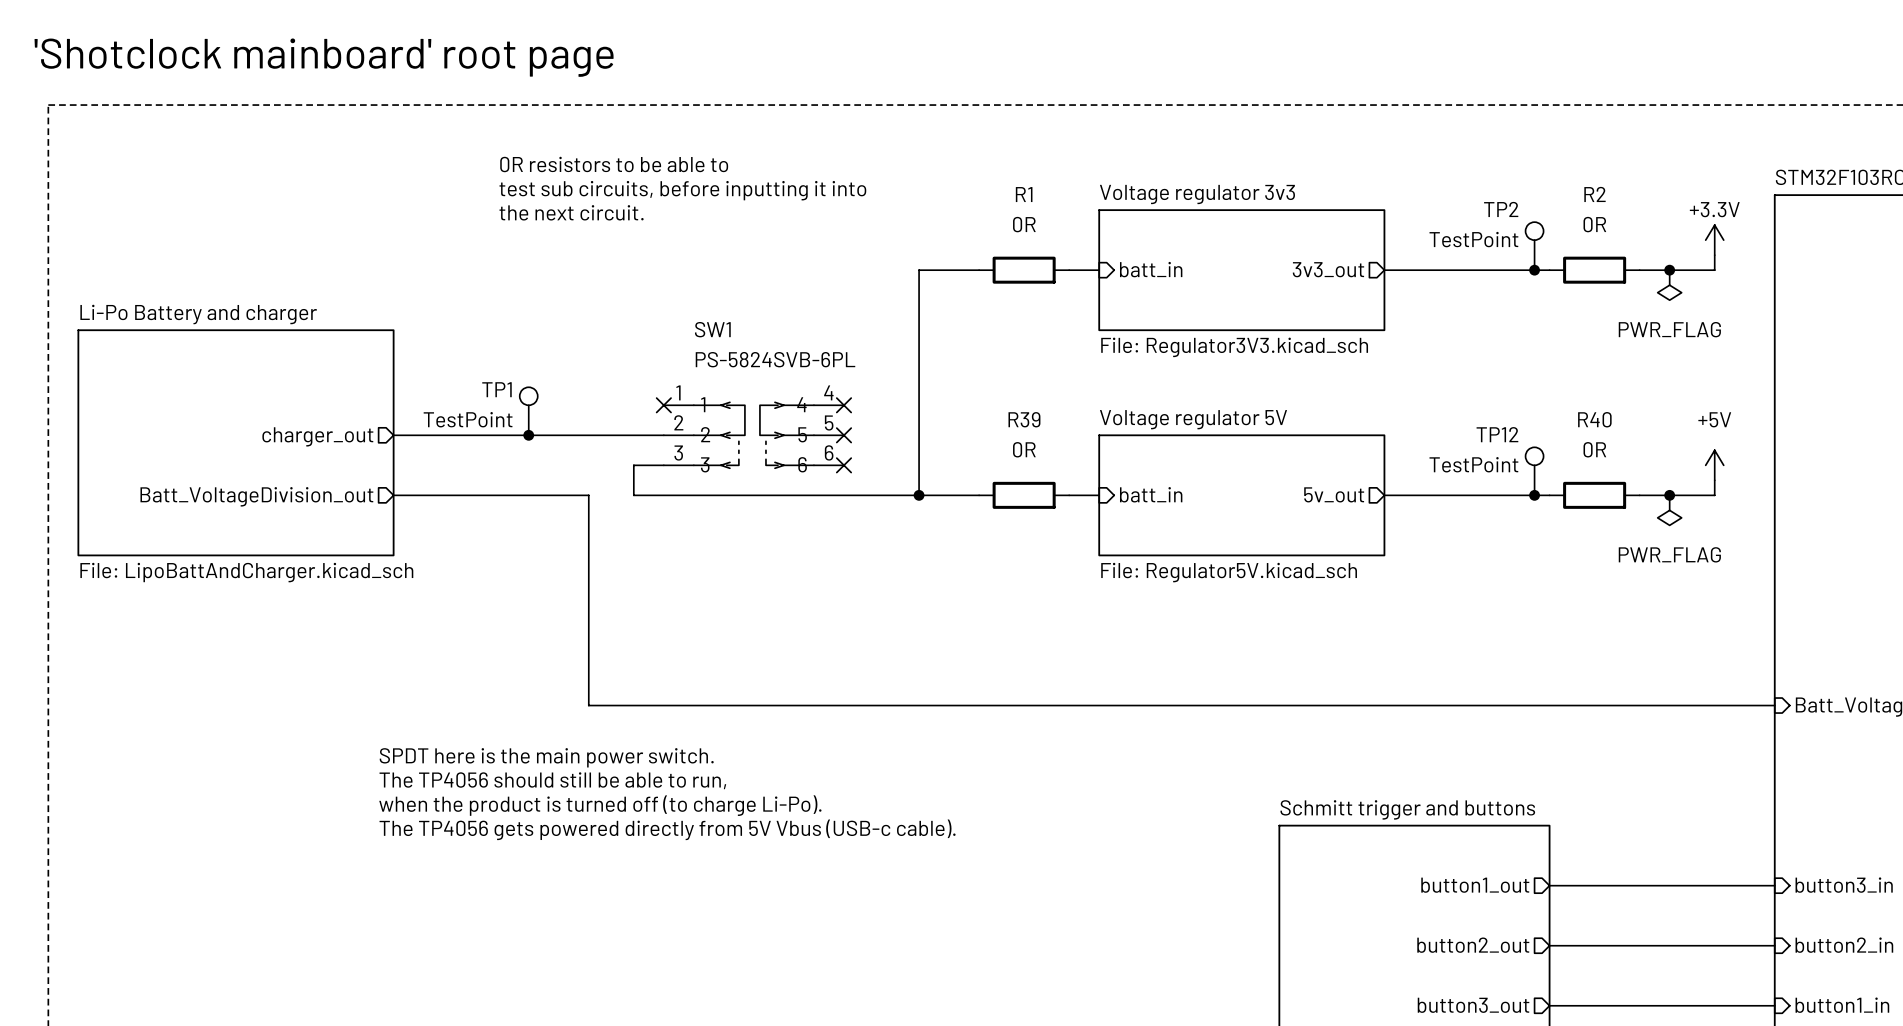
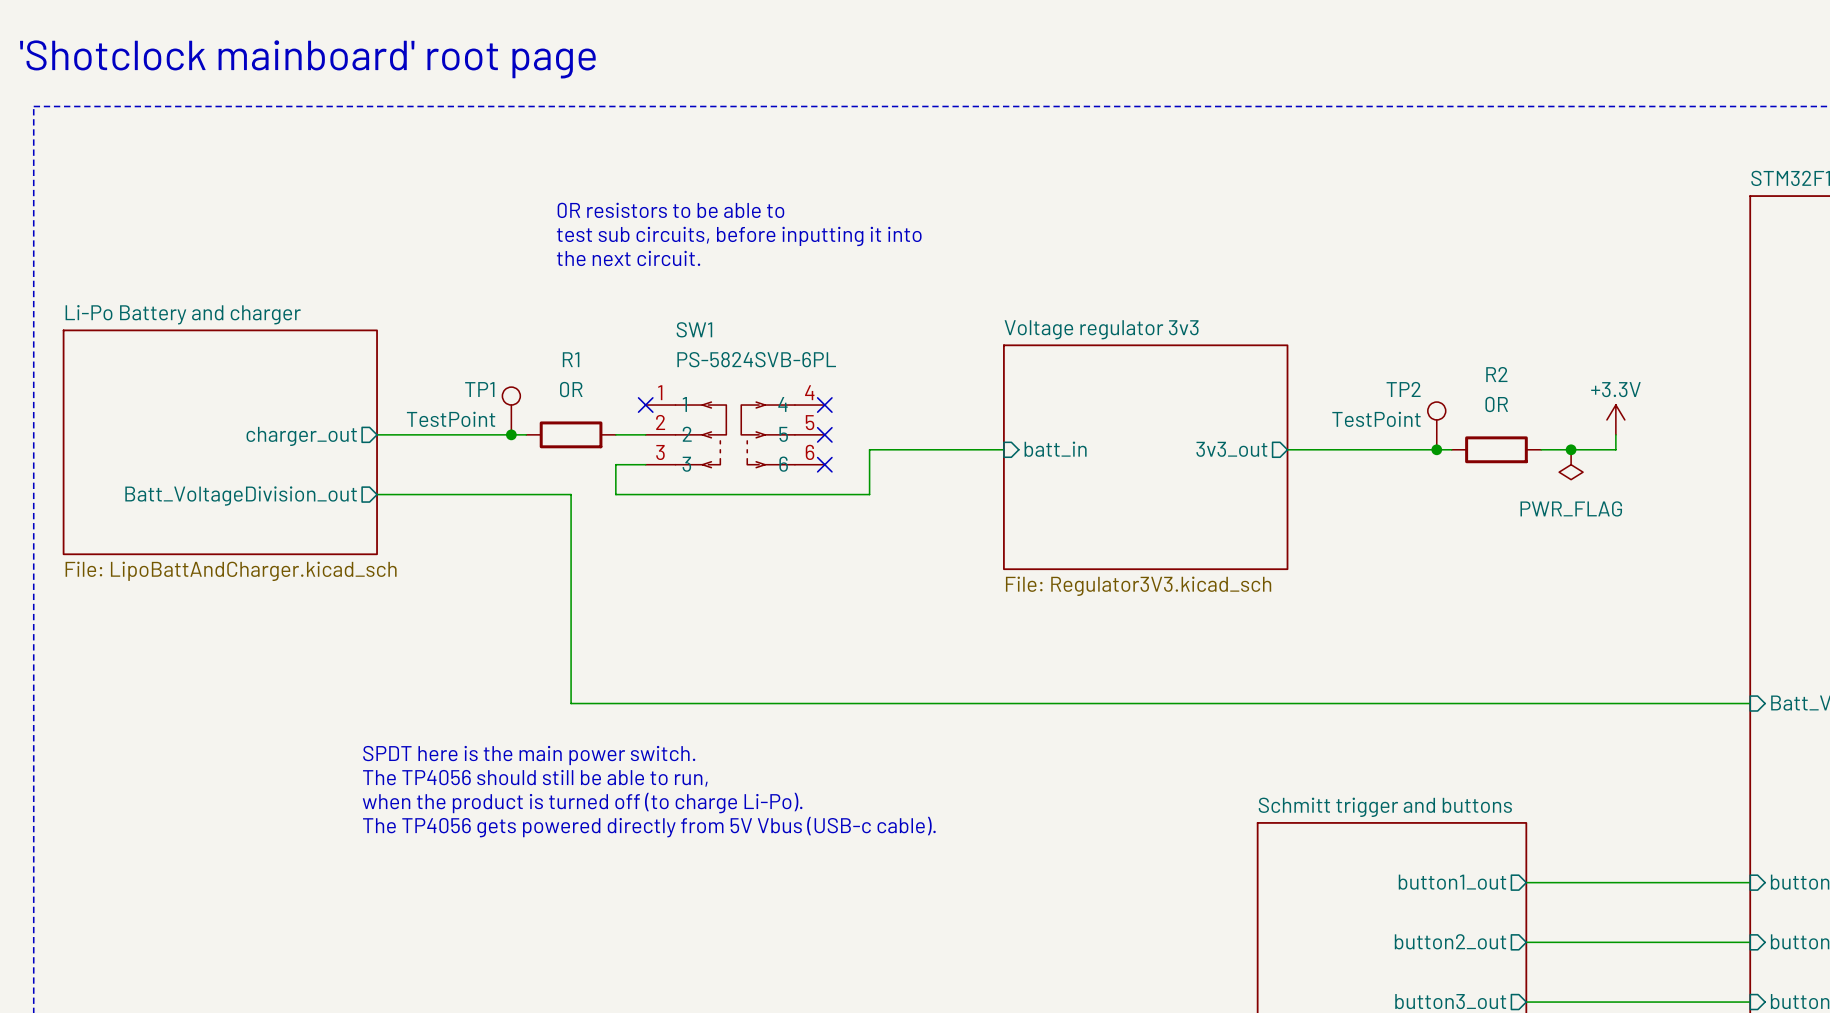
text position: 0R resistors to be able to (614, 164) -> 0R resistors to be able to (670, 210)
text position: test sub circuits, before inputting it into (682, 190) -> test sub circuits, before inputting it into (739, 236)
sheet Voltage regulator 3v3 name position: Voltage regulator 3v3 (1197, 194) -> Voltage regulator 3v3 (1101, 329)
sheet Voltage regulator 3v3 shape: [1098, 209, 1386, 332] -> [1003, 344, 1289, 571]
text position: the next circuit. (571, 212) -> the next circuit. (628, 258)
power symbol position: +3.3V (1714, 240) -> +3.3V (1615, 419)
TP2 position: (1534, 246) -> (1436, 425)
wire: (1714, 255) (1714, 270) (1639, 270) -> none
sheet pin: batt_in (1151, 269) -> none
sheet pin position: 3v3_out (1328, 269) -> 3v3_out (1231, 449)
wire: (979, 270) (919, 270) (919, 495) -> none
R1 position: (1024, 270) -> (571, 434)
wire: (1069, 270) (1099, 270) -> none
wire: (1384, 270) (1549, 270) -> none
junction: (1534, 270) -> none
R2 position: (1594, 270) -> (1496, 449)
junction: (1669, 270) -> none
power symbol: PWR_FLAG (1669, 285) -> none
sheet Voltage regulator 3v3 value position: File: Regulator3V3.kicad_sch (1234, 347) -> File: Regulator3V3.kicad_sch (1138, 586)
wire: (543, 435) (633, 435) -> none
junction: none -> (1436, 449)
junction: none -> (1571, 449)
power symbol: +5V (1714, 465) -> none
TP12: TestPoint (1534, 471) -> none
wire: (1714, 480) (1714, 495) (1639, 495) -> (1615, 434) (1615, 449) (1541, 449)
sheet pin position: batt_in (1151, 494) -> batt_in (1055, 449)
sheet pin: 5v_out (1334, 494) -> none
wire: (889, 495) (979, 495) -> (869, 494) (869, 449) (1003, 449)
junction: (919, 495) -> none
R39: 0R (1024, 495) -> none
wire: (1069, 495) (1099, 495) -> none
sheet Voltage regulator 5V: File: Regulator5V.kicad_sch (1241, 495) -> none
wire: (1384, 495) (1549, 495) -> (1287, 449) (1451, 449)
junction: (1534, 495) -> none
R40: 0R (1594, 495) -> none
junction: (1669, 495) -> none
power symbol position: PWR_FLAG (1669, 510) -> PWR_FLAG (1571, 464)

